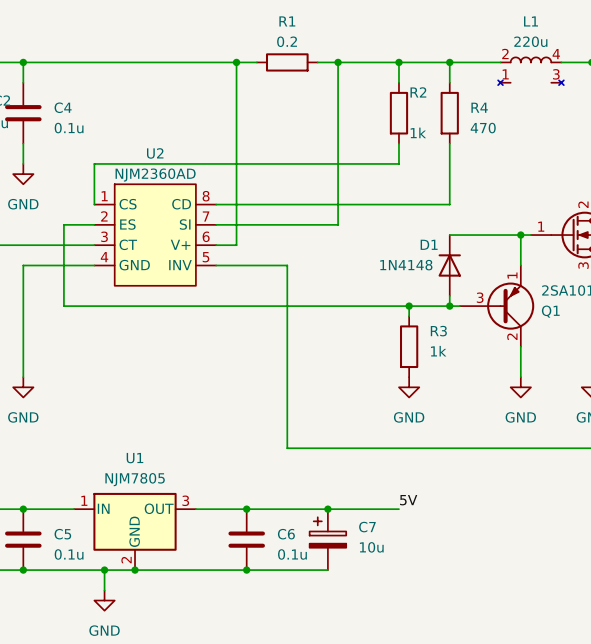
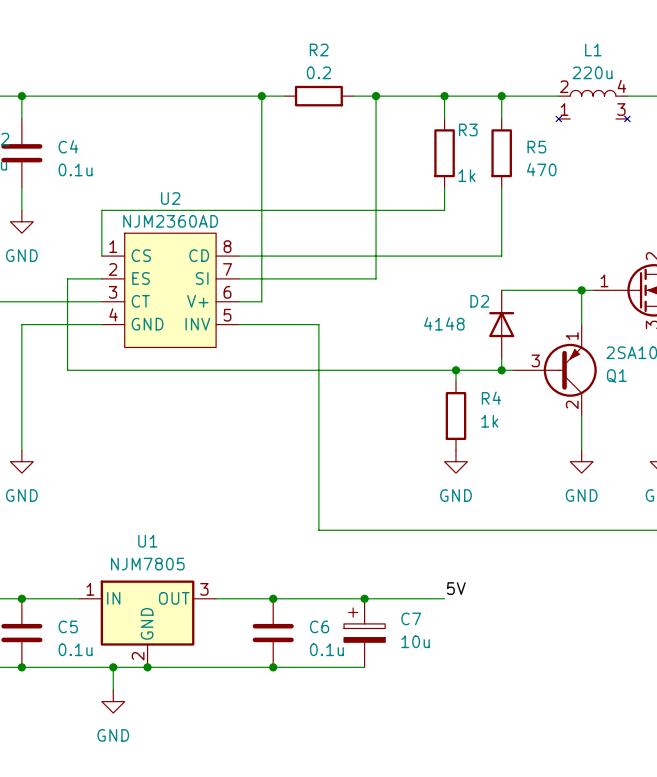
R1 name: R1 (287, 21) -> R2 (319, 50)
R2 name: R2 (418, 92) -> R3 (468, 129)
R4 name: R4 (479, 107) -> R5 (536, 147)
D1 name: D1 (429, 244) -> D2 (479, 301)
D1 value: 1N4148 (406, 265) -> 4148 (444, 323)
R3 name: R3 (438, 331) -> R4 (491, 398)

